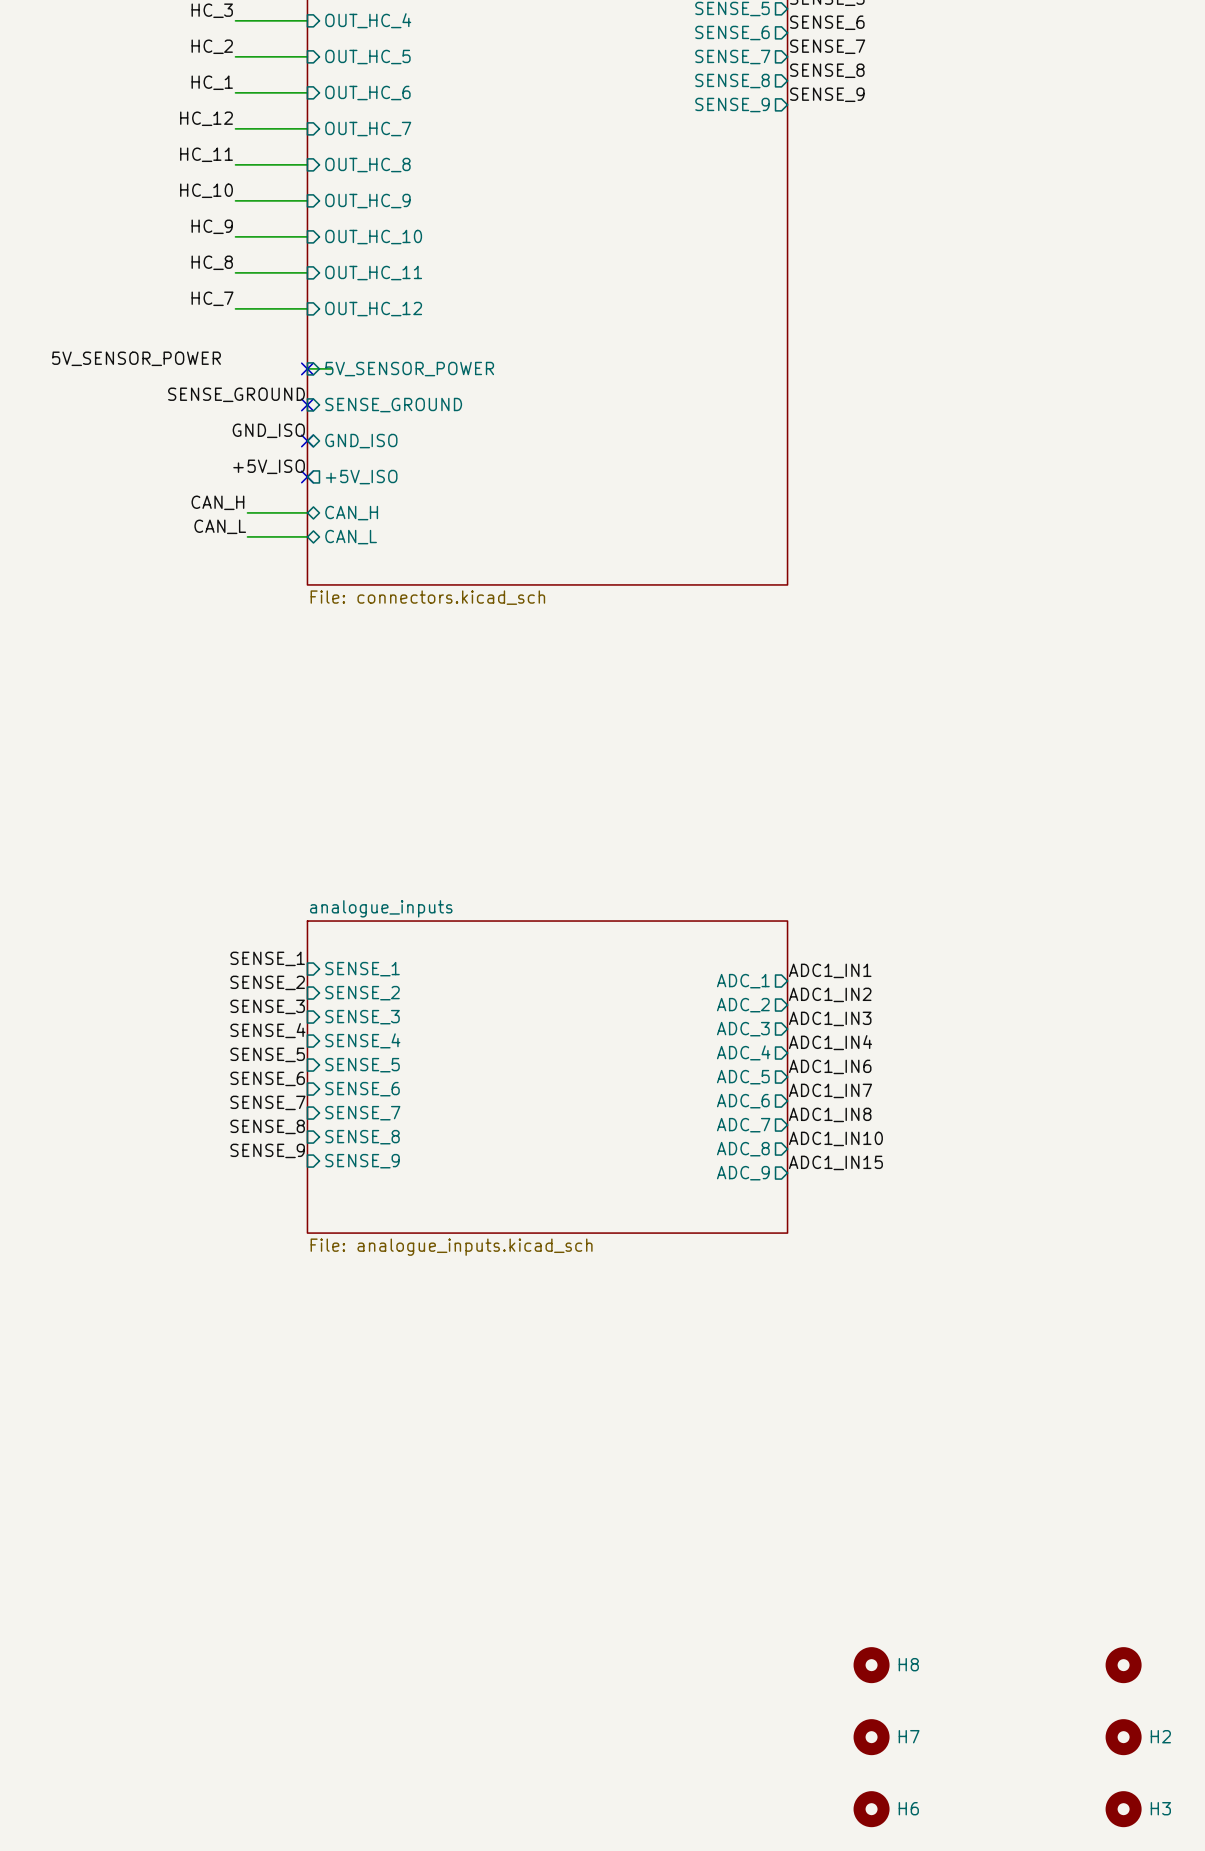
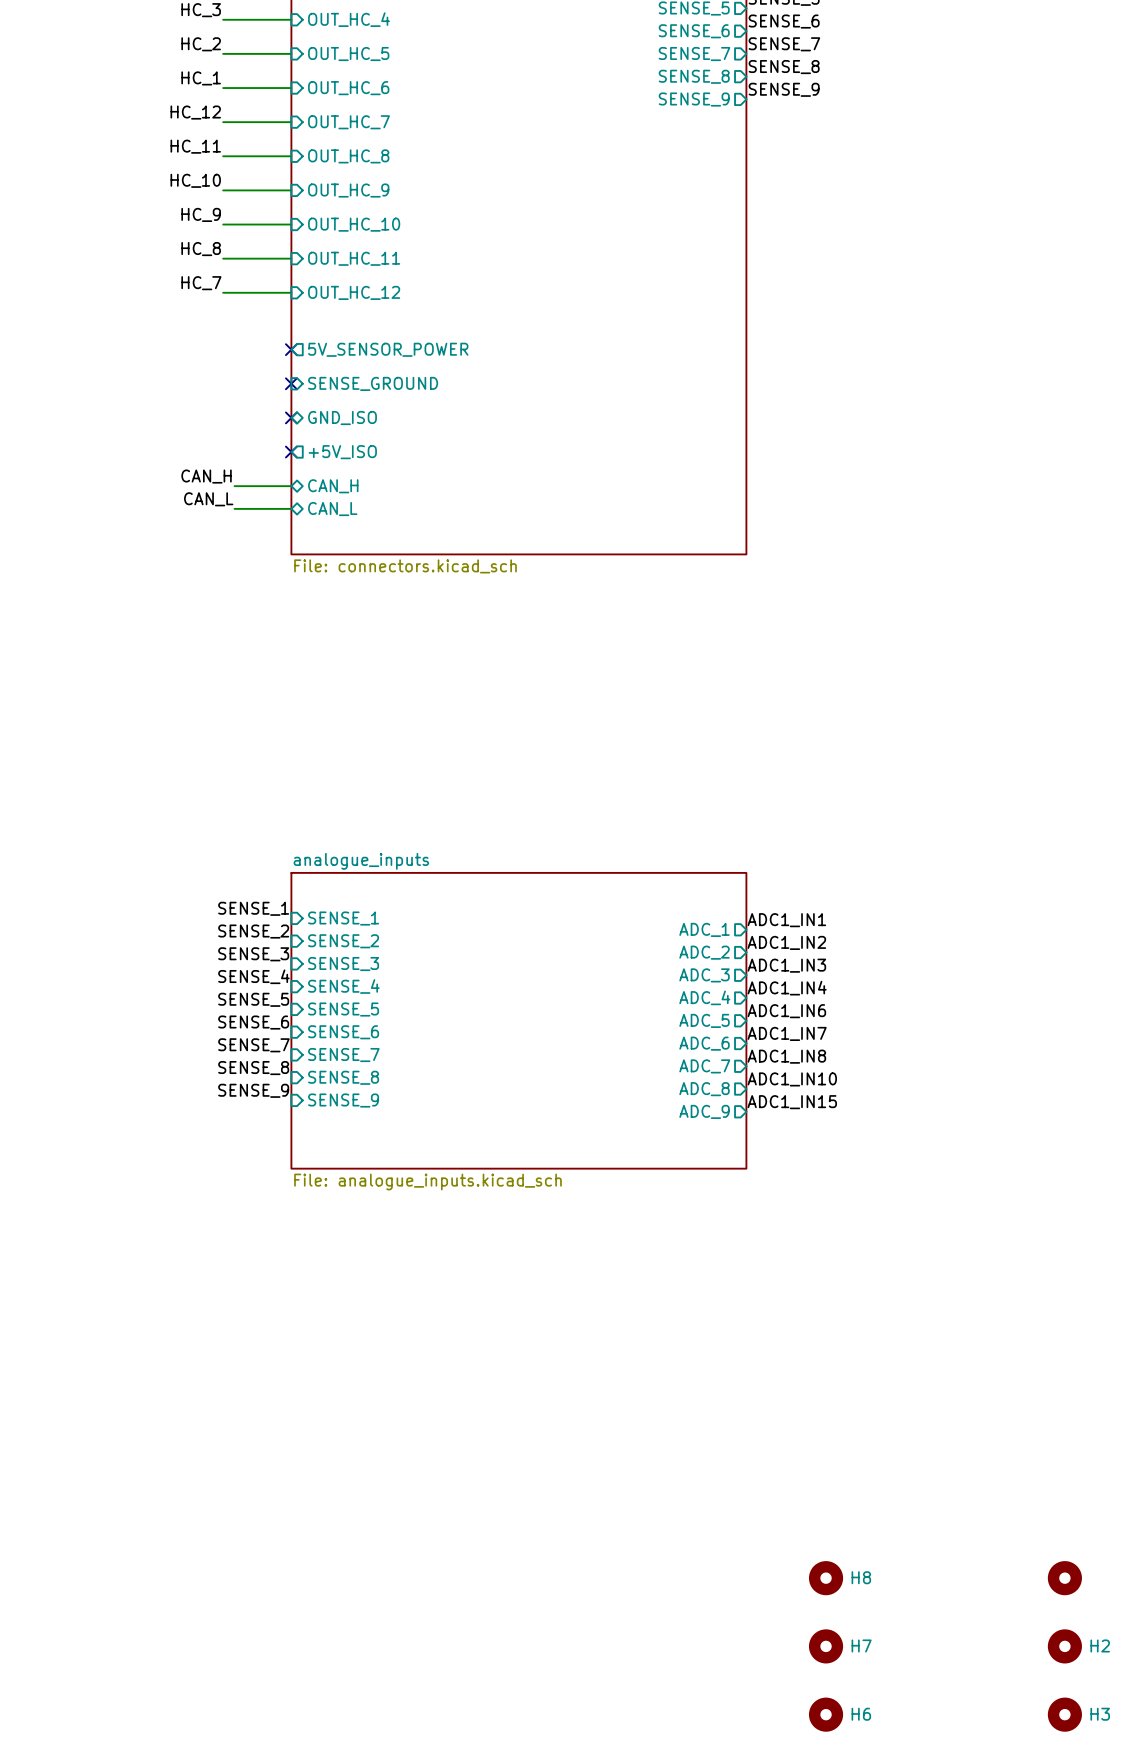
label: 5V_SENSOR_POWER (136, 358) -> none
wire: (307, 368) (331, 368) -> none
sheet pin shape: input (409, 369) -> output (388, 349)
label: SENSE_GROUND (236, 394) -> none
label: GND_ISO (268, 430) -> none
label: +5V_ISO (269, 466) -> none

